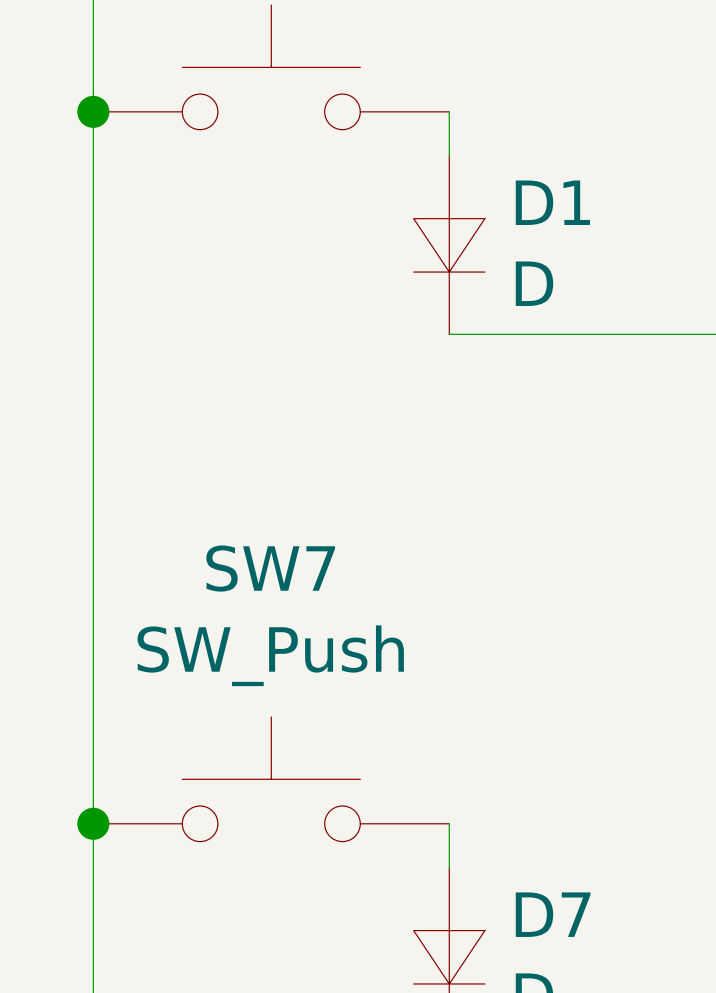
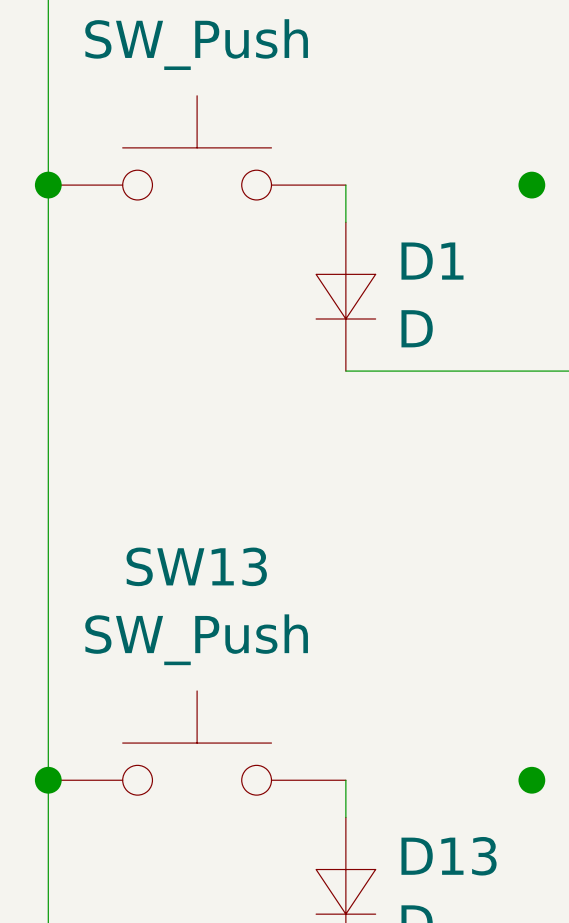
junction: none -> (531, 185)
SW7 name: SW7 (270, 568) -> SW13 (196, 566)
junction: none -> (531, 780)
D7 name: D7 (553, 914) -> D13 (449, 856)

